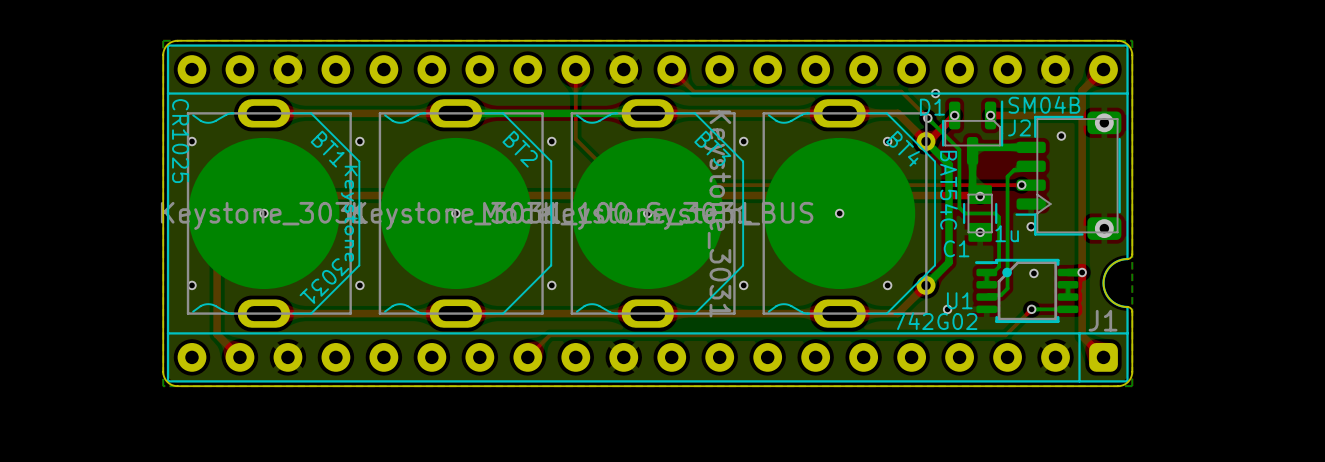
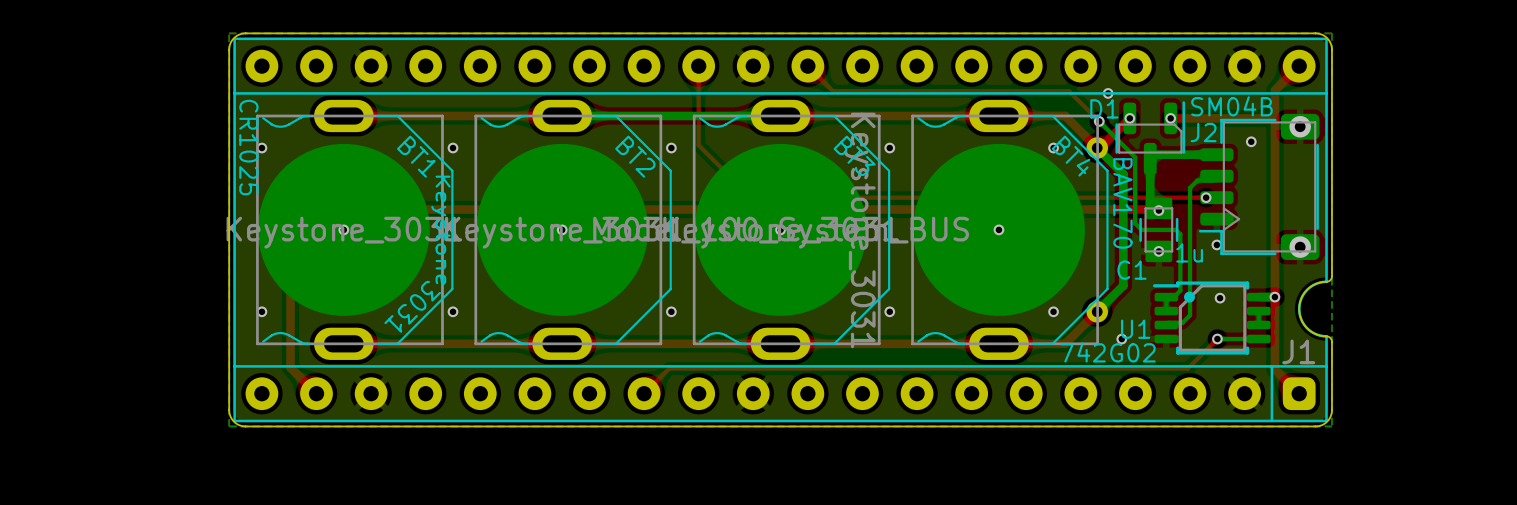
D1 value: BAT54C (948, 190) -> BAV170 (1122, 203)

